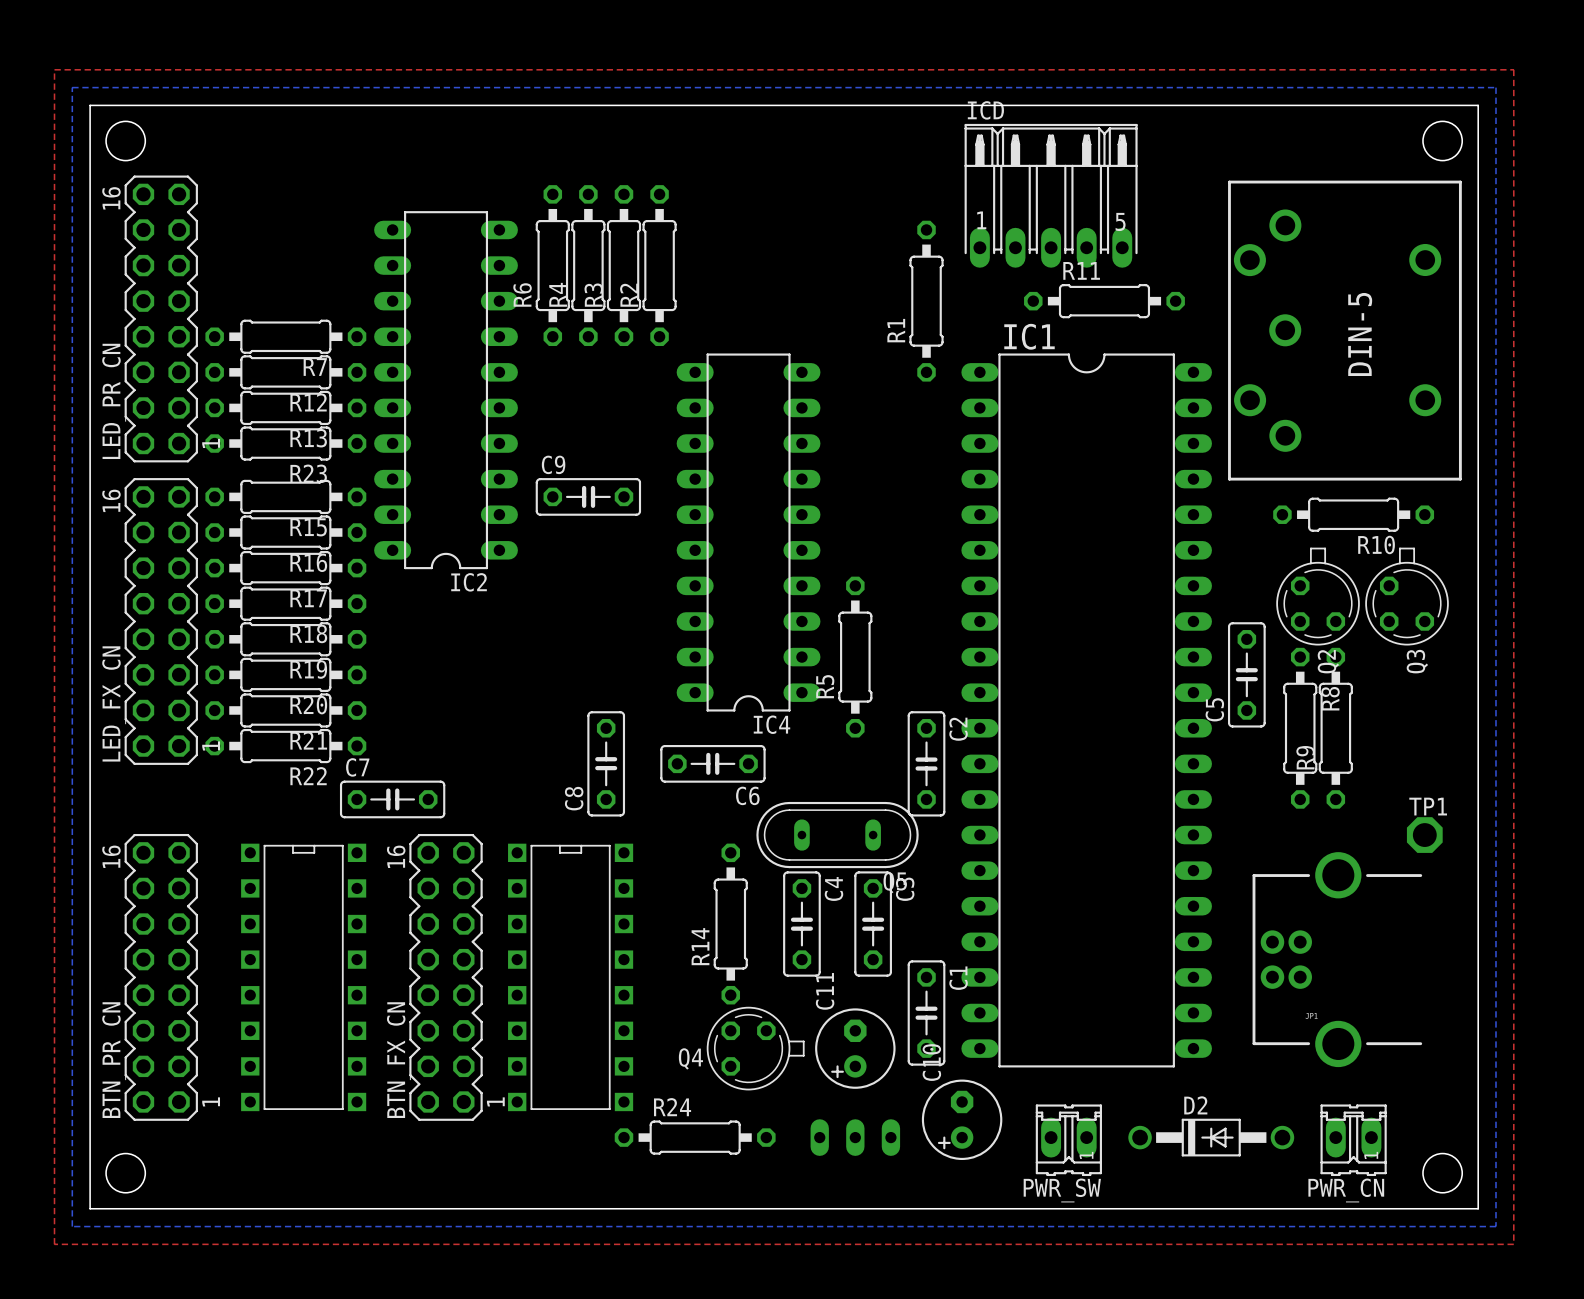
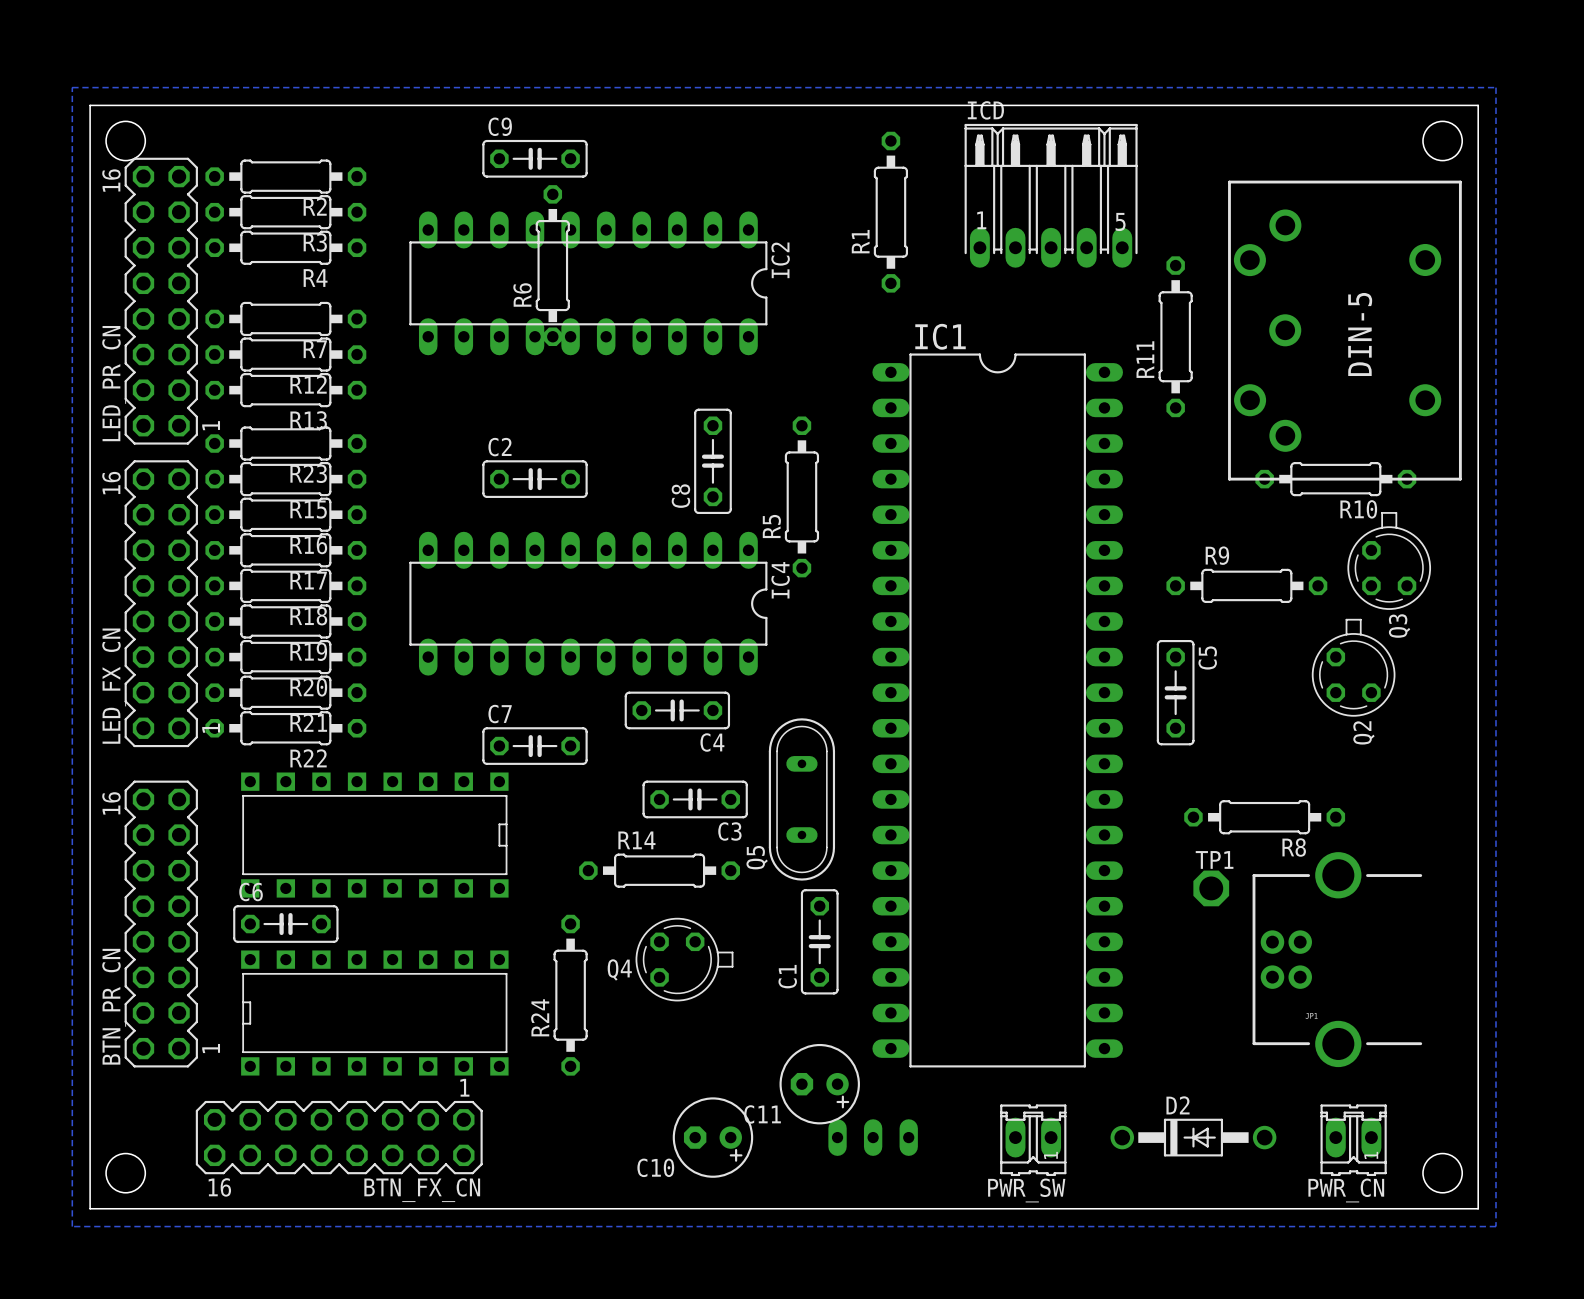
top zone outline: (54, 69) (1513, 69) (1513, 1244) (54, 1244) (54, 69) -> none
R4 rotation: 0° (588, 265) -> 90° clockwise (285, 247)
R4 position: (588, 265) -> (285, 247)
R3 rotation: 0° (623, 265) -> 90° clockwise (285, 212)
R3 position: (623, 265) -> (285, 212)
R2 rotation: 0° (659, 265) -> 90° clockwise (285, 176)
R2 position: (659, 265) -> (285, 176)
R11 name position: R11 (1081, 270) -> R11 (1145, 359)
R4 name position: R4 (558, 294) -> R4 (315, 278)
R3 name position: R3 (593, 295) -> R3 (315, 242)
R2 name position: R2 (629, 295) -> R2 (315, 206)
R1 position: (926, 301) -> (890, 212)
R11 rotation: 0° (1104, 301) -> 90° clockwise (1175, 336)
LED_PR_CN position: (161, 318) -> (161, 301)
R7 position: (285, 336) -> (285, 318)
R12 position: (285, 372) -> (285, 354)
IC2 rotation: 0° (446, 390) -> 90° counterclockwise (588, 283)
R13 position: (285, 407) -> (285, 390)
R15 position: (285, 496) -> (285, 479)
C9 position: (588, 496) -> (535, 158)
R10 position: (1353, 514) -> (1335, 479)
R16 position: (285, 532) -> (285, 514)
IC4 rotation: 0° (748, 532) -> 90° counterclockwise (588, 603)
R17 position: (285, 568) -> (285, 550)
Q2 position: (1318, 596) -> (1353, 667)
Q3 position: (1407, 596) -> (1389, 560)
R18 position: (285, 603) -> (285, 585)
LED_FX_CN position: (161, 621) -> (161, 603)
R19 position: (285, 639) -> (285, 621)
R5 position: (855, 657) -> (801, 496)
R20 position: (285, 674) -> (285, 657)
C5 rotation: 0° (1246, 674) -> 180° (1175, 692)
C5 position: (1246, 674) -> (1175, 692)
R21 position: (285, 710) -> (285, 692)
IC1 position: (1086, 710) -> (997, 710)
R8 rotation: 0° (1300, 728) -> 90° clockwise (1264, 817)
R9 rotation: 0° (1335, 728) -> 90° clockwise (1246, 585)
R9 position: (1335, 728) -> (1246, 585)
R22 position: (285, 746) -> (285, 728)
C8 position: (606, 763) -> (712, 461)
C6 rotation: 0° (712, 763) -> 180° (285, 924)
C6 position: (712, 763) -> (285, 924)
C2 rotation: 0° (926, 763) -> 90° counterclockwise (535, 479)
C2 position: (926, 763) -> (535, 479)
C7 position: (392, 799) -> (535, 746)
part: none -> (374, 835)
Q5 rotation: 0° (837, 835) -> 90° clockwise (801, 799)
TP1 position: (1424, 835) -> (1211, 888)
R14 rotation: 0° (730, 924) -> 90° clockwise (659, 870)
C4 rotation: 0° (801, 924) -> 90° clockwise (677, 710)
C4 position: (801, 924) -> (677, 710)
C3 rotation: 0° (873, 924) -> 90° clockwise (695, 799)
C3 position: (873, 924) -> (695, 799)
BTN_PR_CN position: (161, 977) -> (161, 924)
part: (303, 977) -> none
BTN_FX_CN: (446, 977) -> none
part: (570, 977) -> none
part: none -> (374, 1013)
C1 rotation: 0° (926, 1013) -> 180° (819, 941)
C1 position: (926, 1013) -> (819, 941)
Q4 position: (755, 1048) -> (684, 959)
C11 rotation: 0° (855, 1048) -> 90° counterclockwise (819, 1084)
C11 position: (855, 1048) -> (819, 1084)
R24 name position: R24 (672, 1107) -> R24 (540, 1017)
C10 rotation: 0° (962, 1119) -> 90° counterclockwise (712, 1137)
C10 position: (962, 1119) -> (712, 1137)
BTN_FX_CN: none -> (339, 1137)
R24 rotation: 0° (695, 1137) -> 90° clockwise (570, 995)
R24 position: (695, 1137) -> (570, 995)
part position: (855, 1137) -> (873, 1137)
D2 position: (1211, 1137) -> (1193, 1137)
PWR_SW position: (1068, 1140) -> (1033, 1140)

